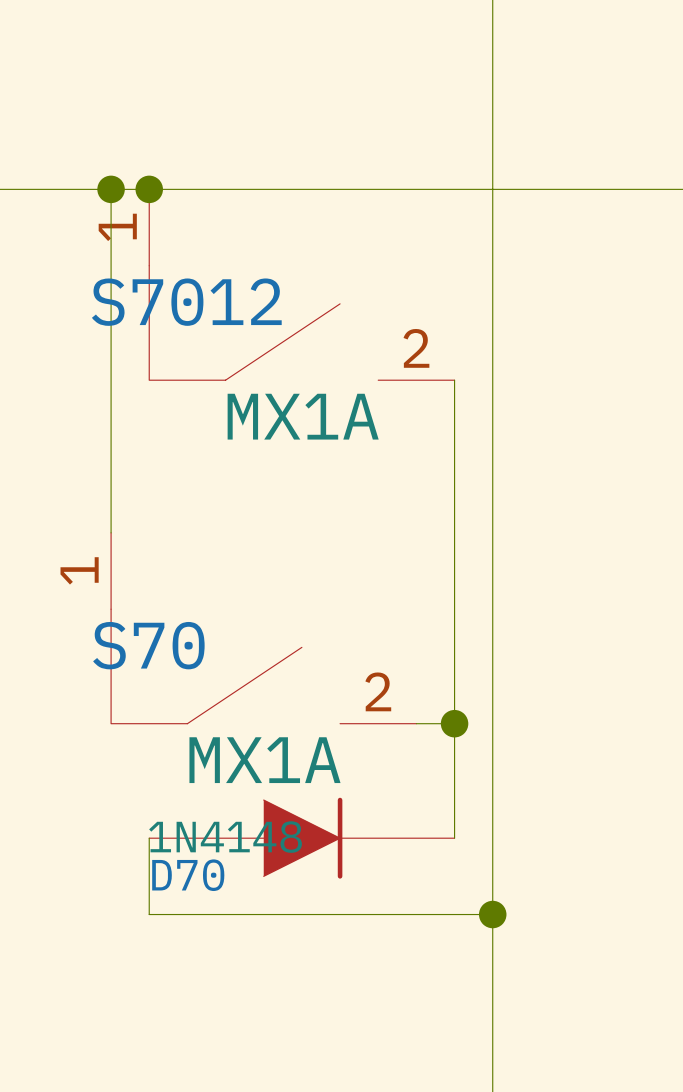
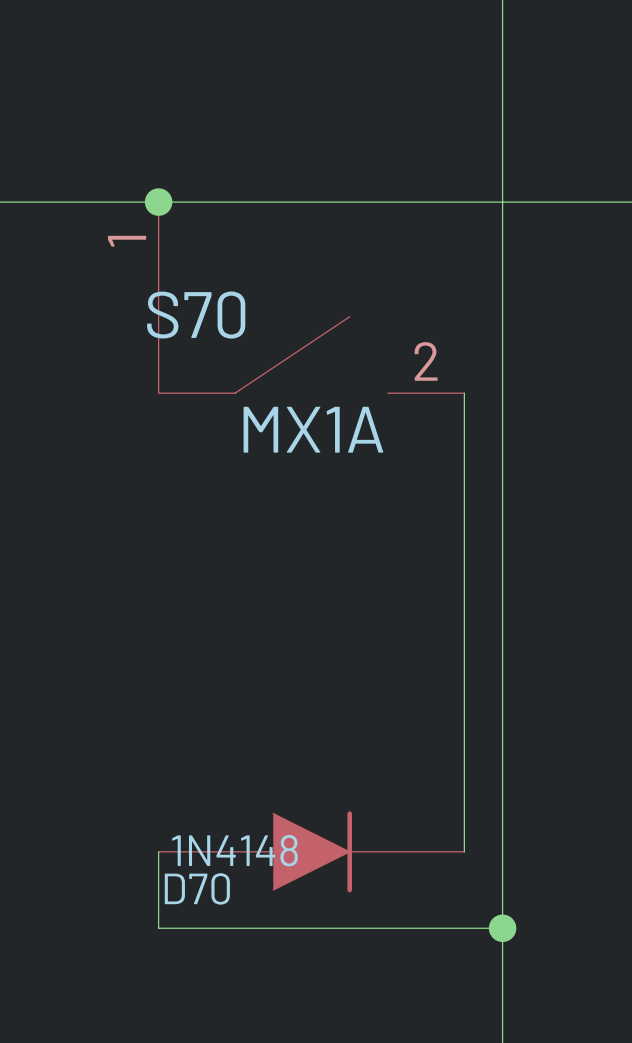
wire: (111, 189) (111, 532) -> none
junction: (111, 189) -> none
S7012 name: S7012 (186, 302) -> S70 (196, 315)
S70: MX1A (263, 628) -> none
wire: (416, 723) (454, 723) -> none
junction: (454, 723) -> none

